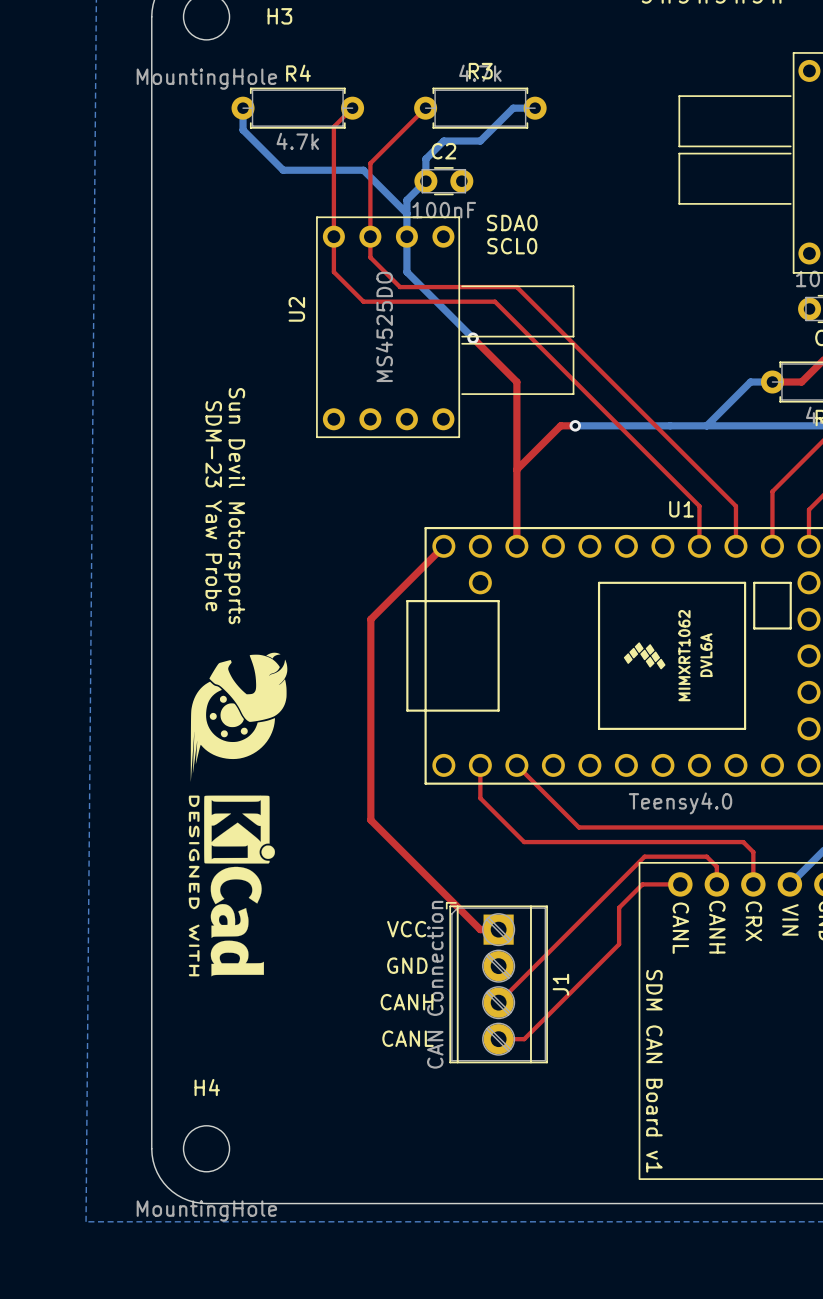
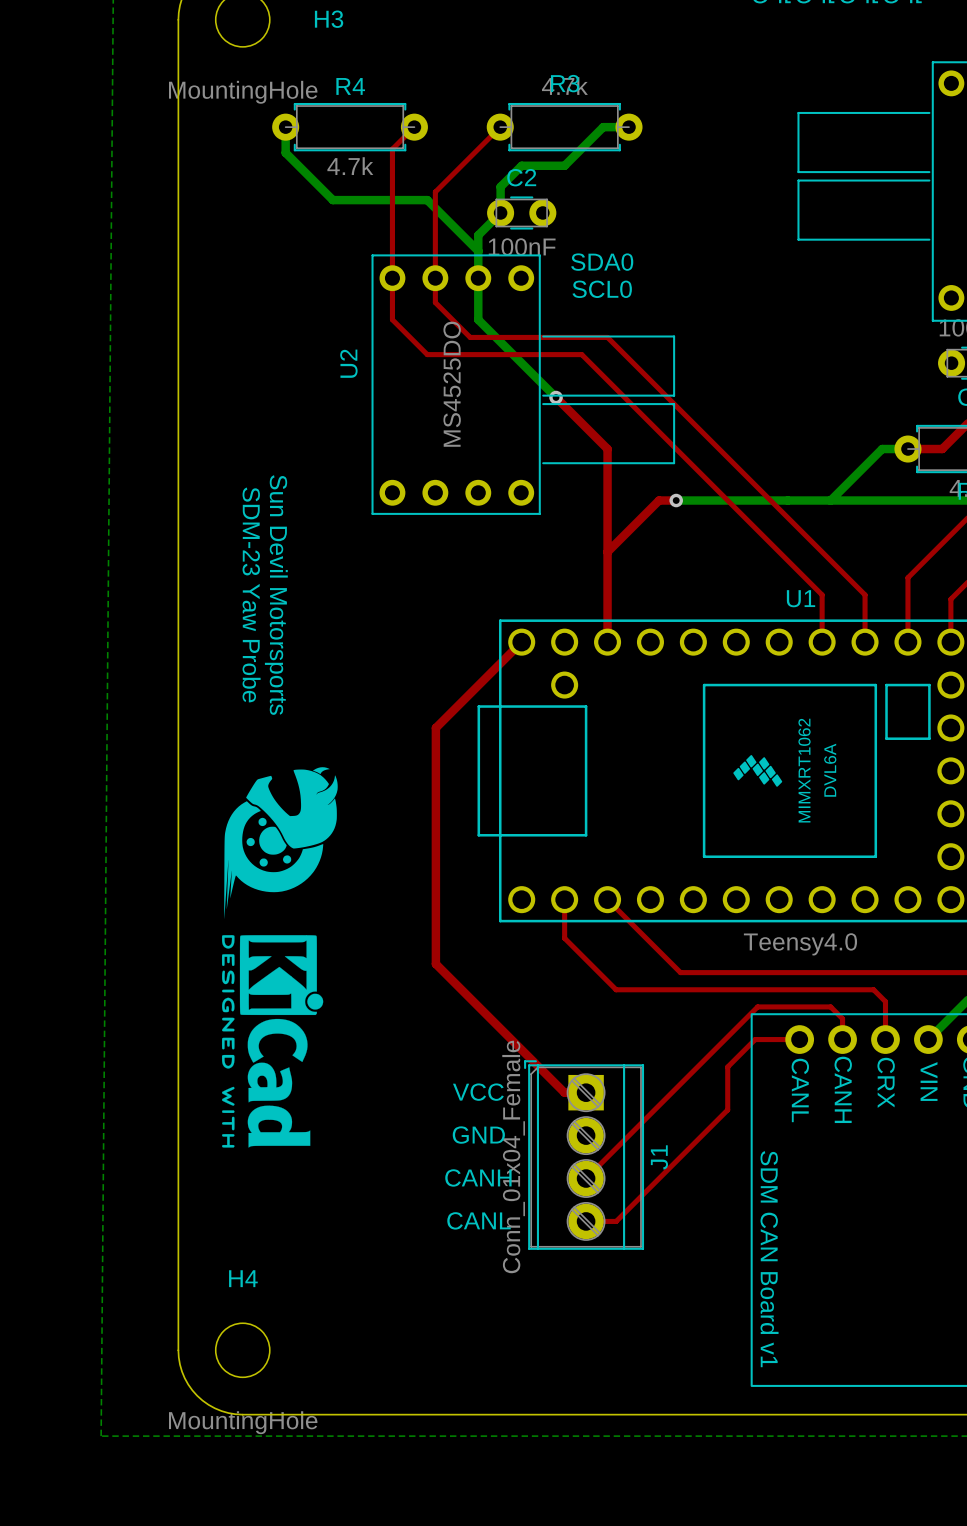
J1 value: CAN Connection (435, 984) -> Conn_01x04_Female (513, 1156)

